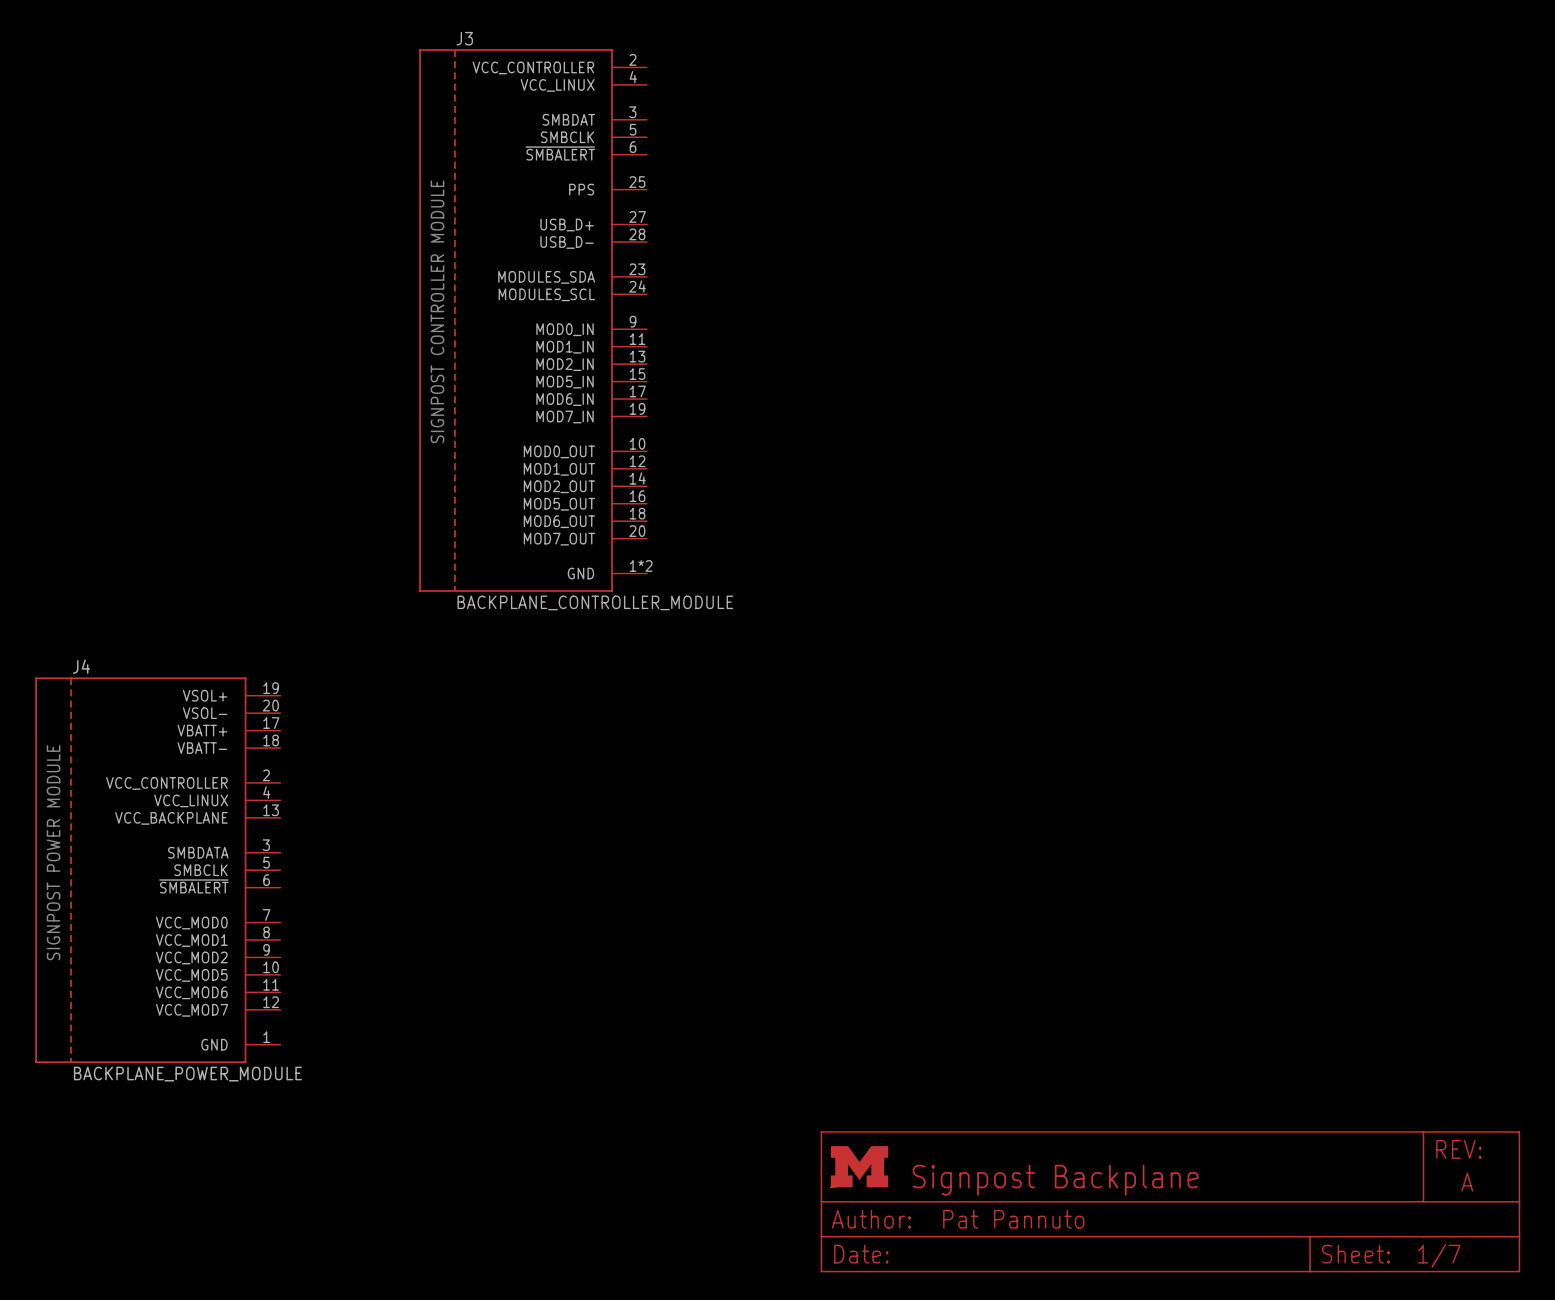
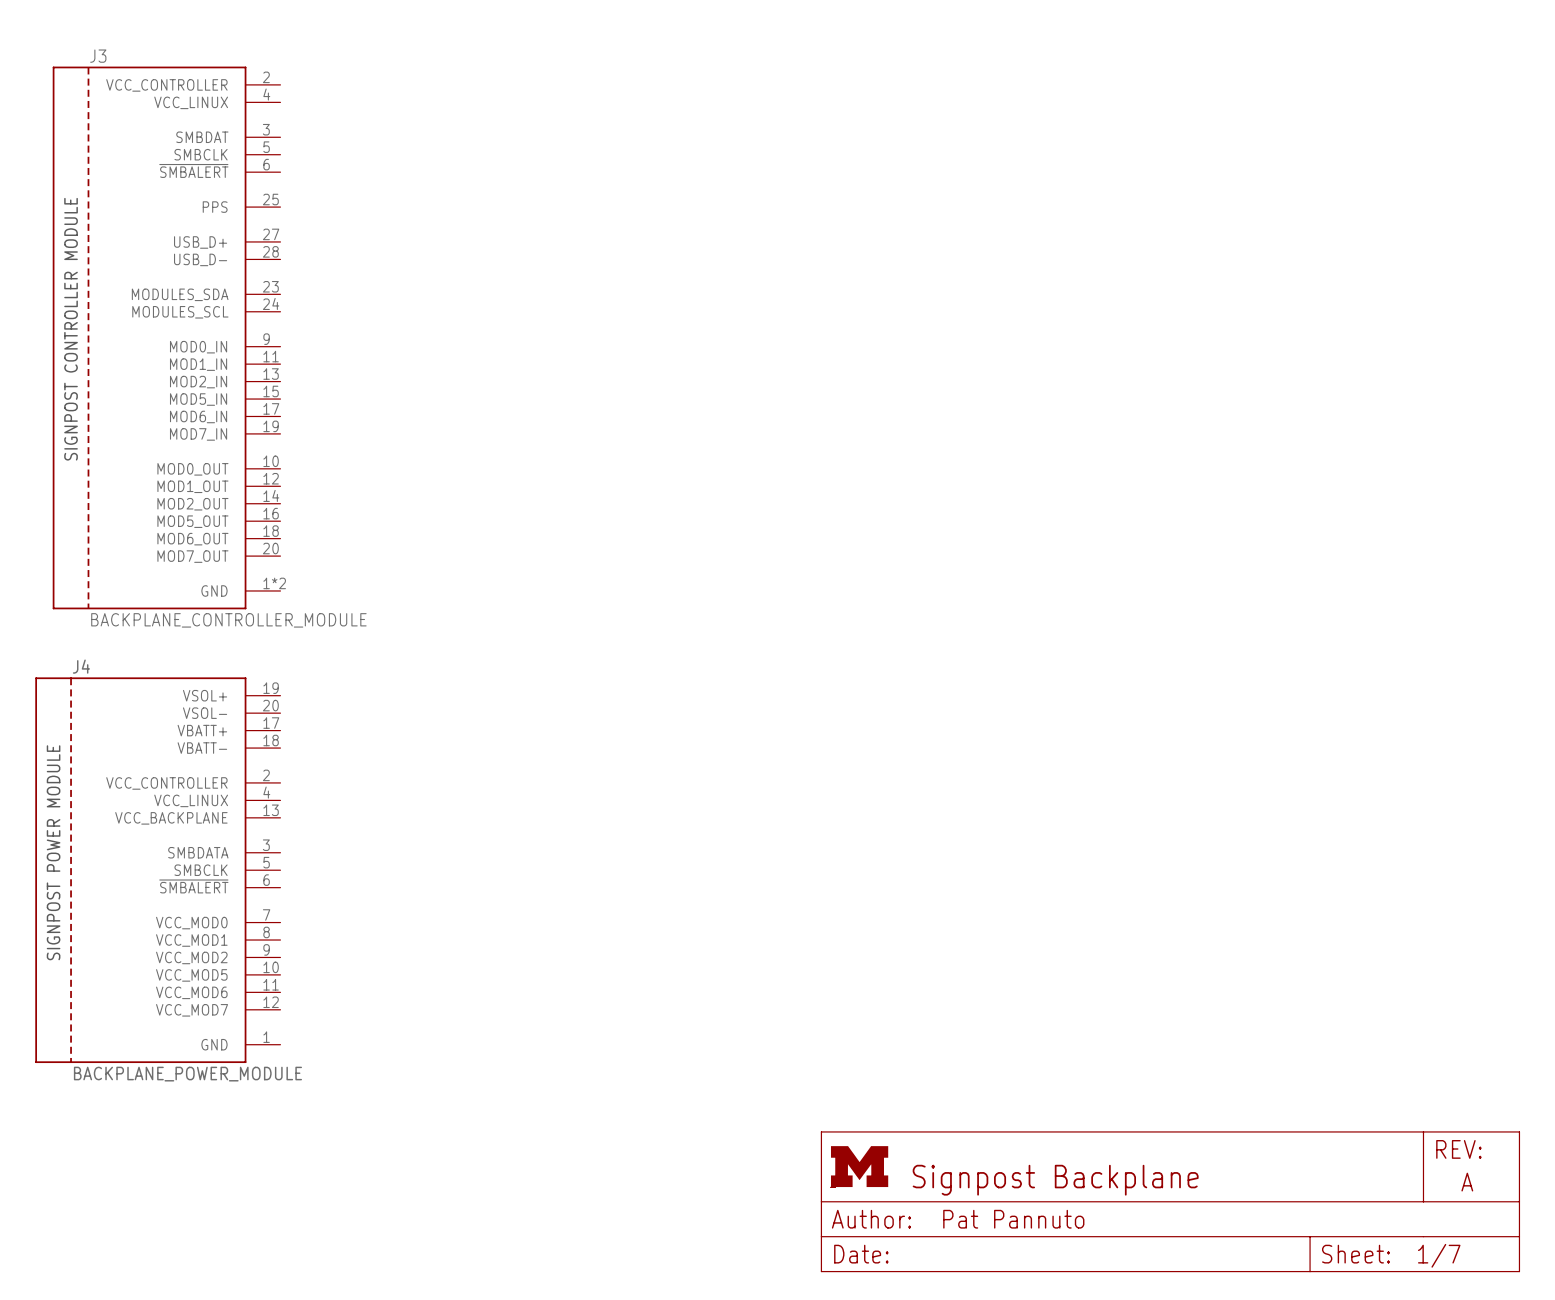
J3 position: (533, 320) -> (166, 337)

